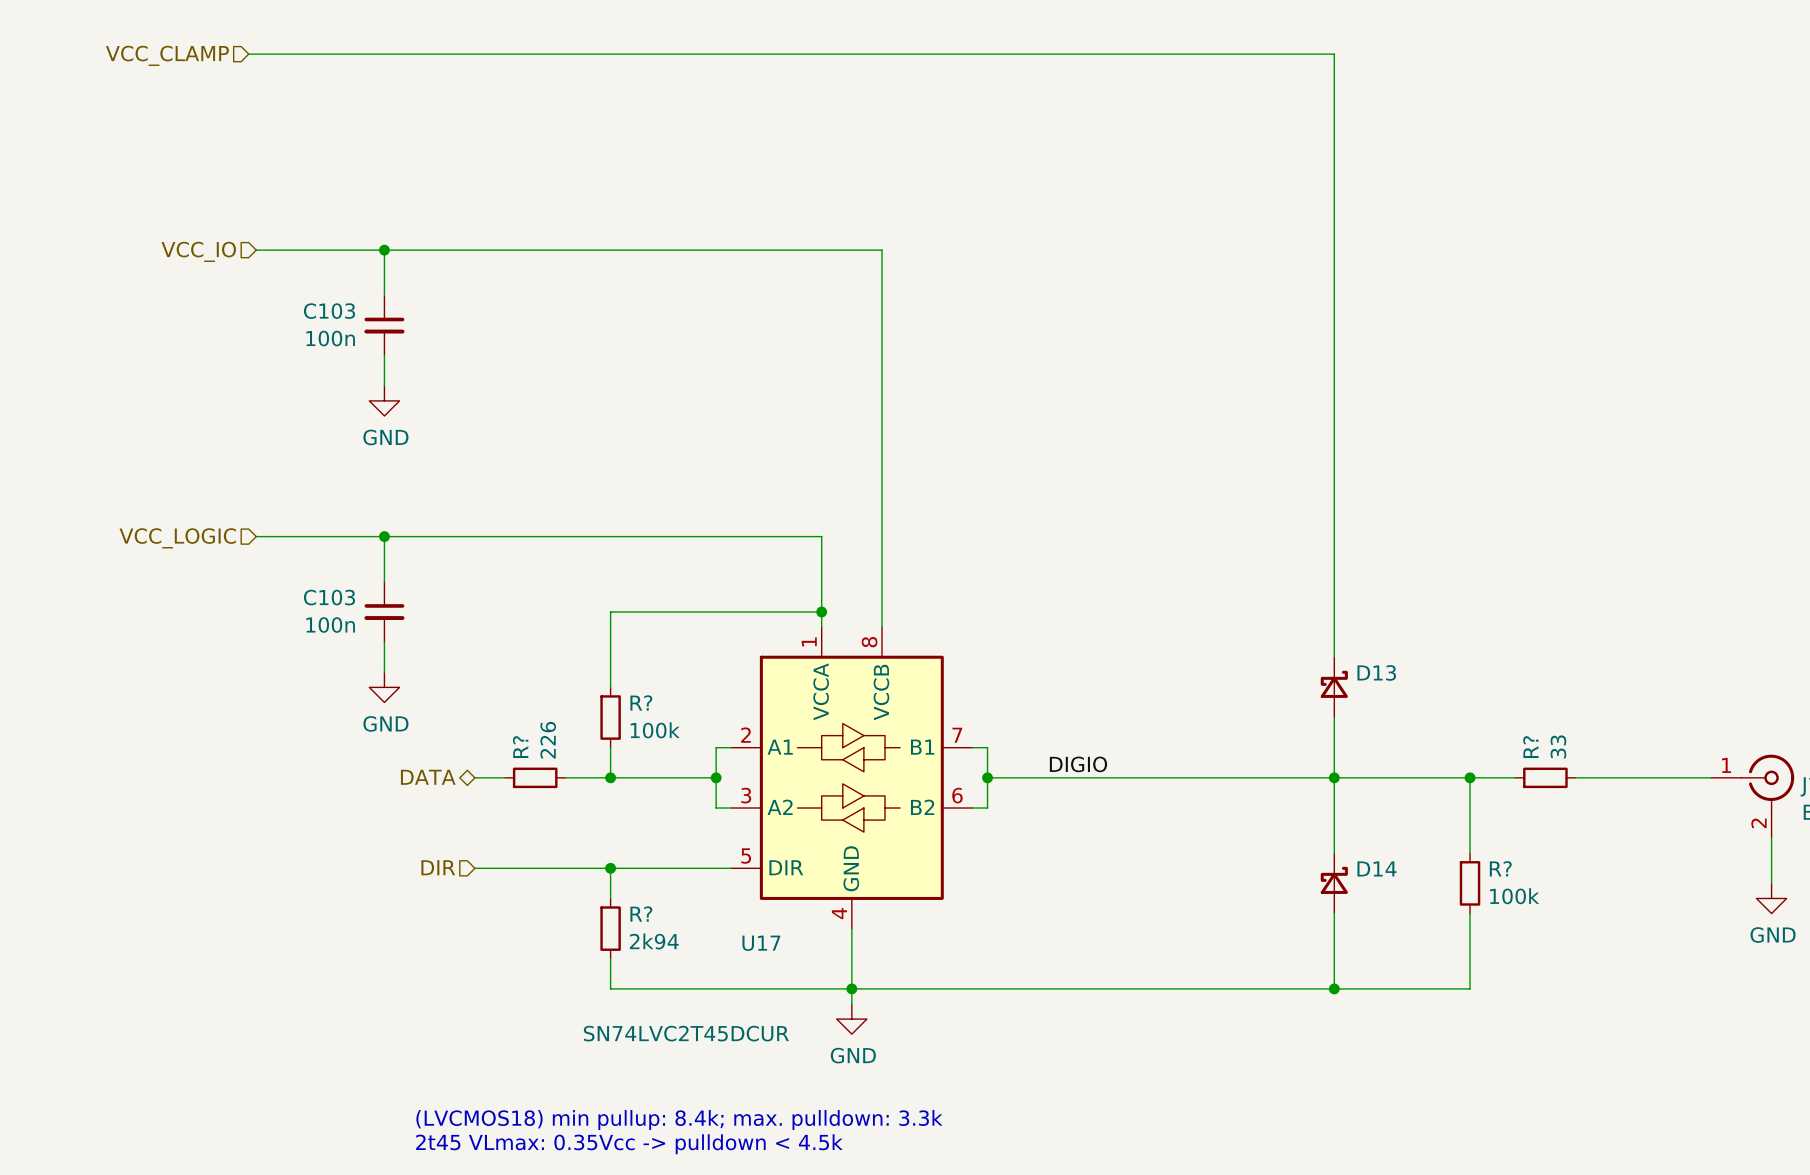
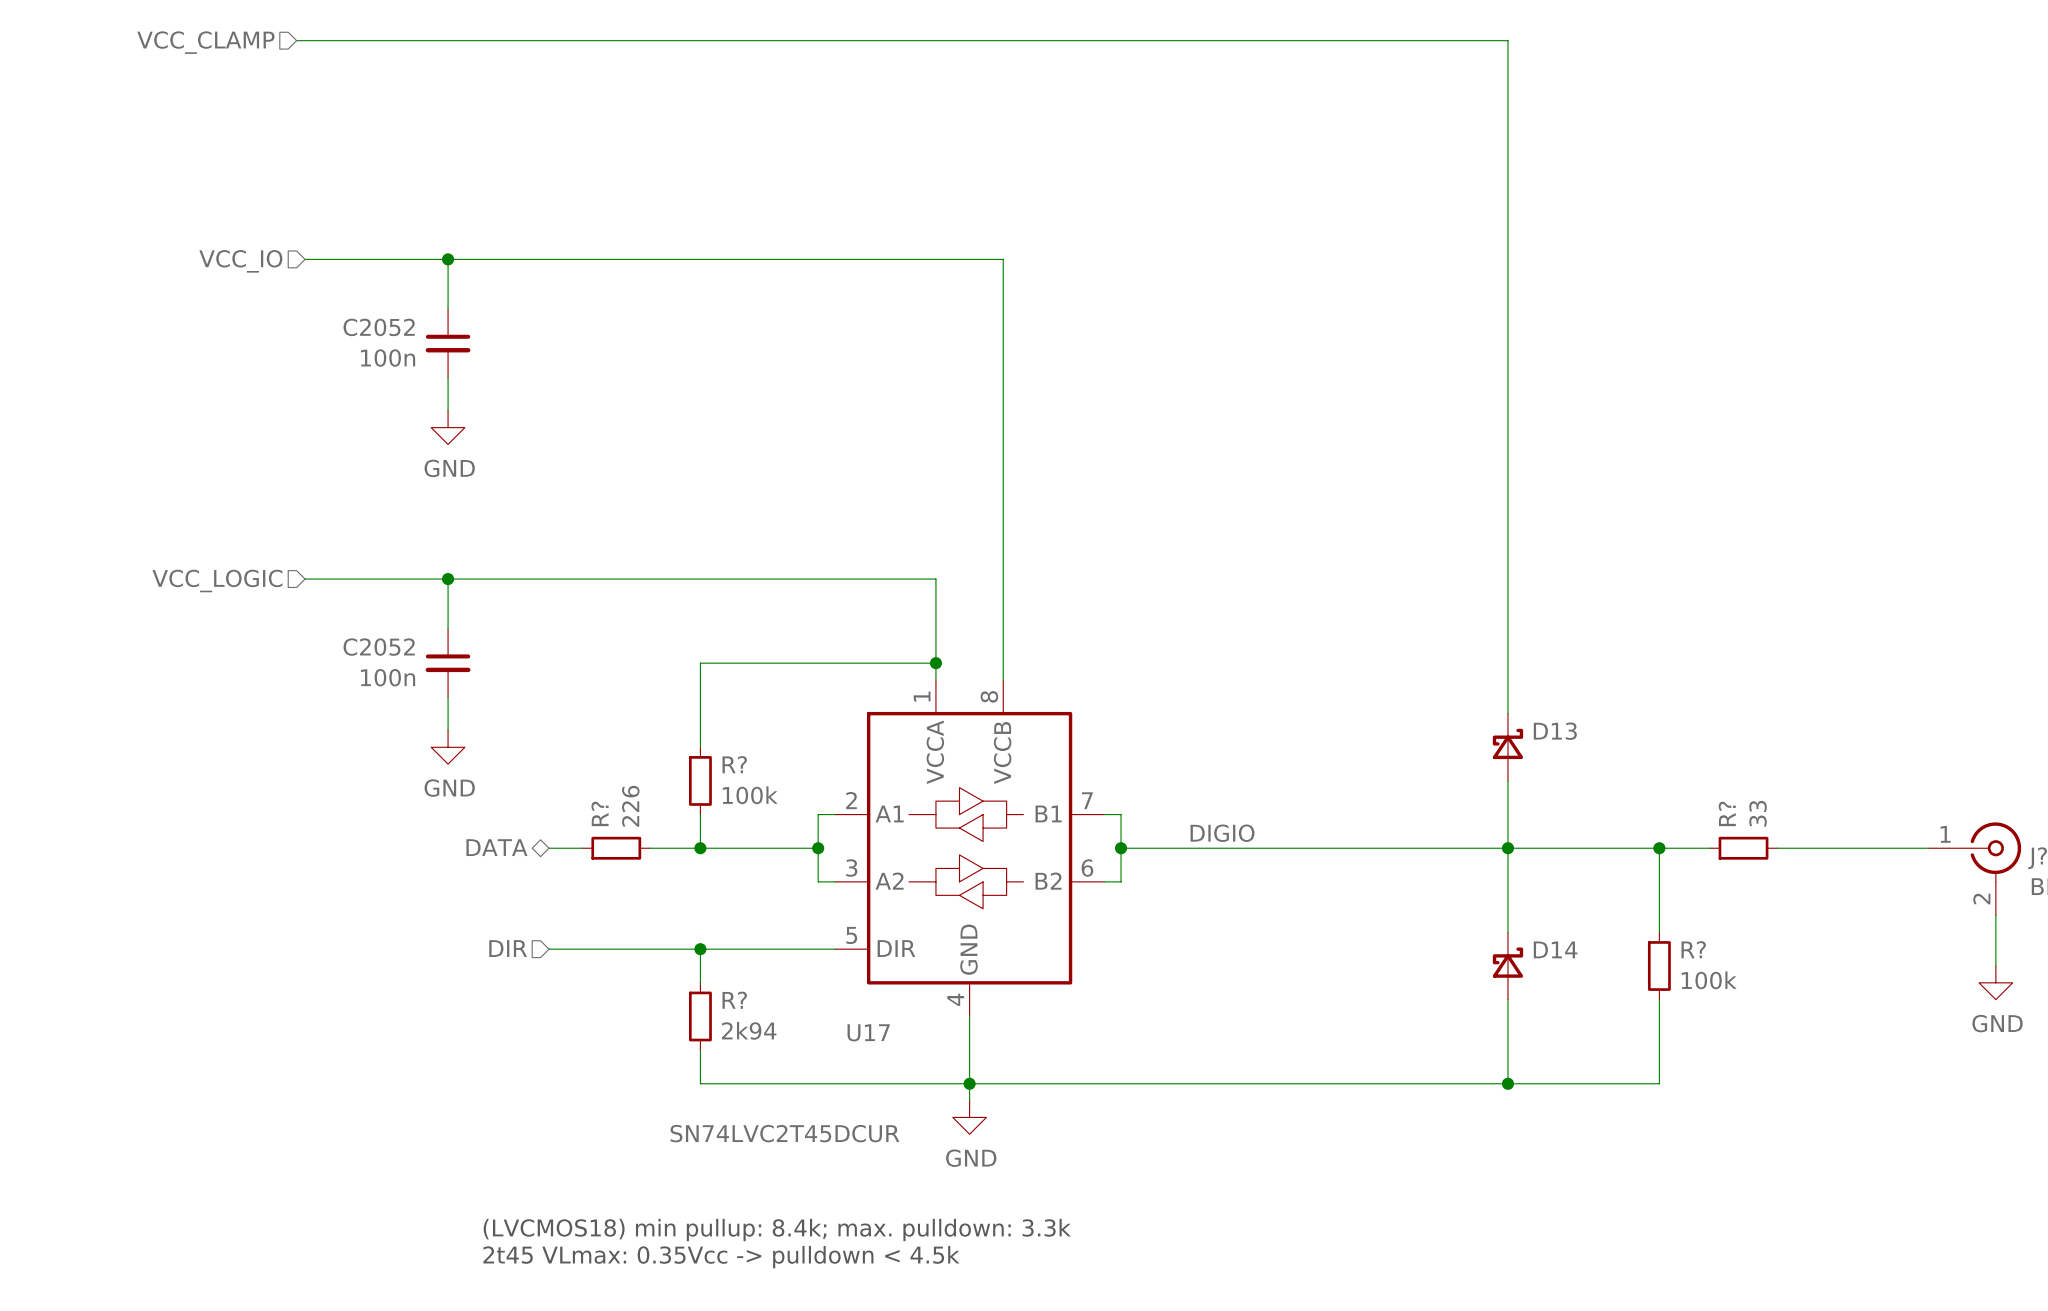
C103 name: C103 (329, 311) -> C2052 (379, 327)
C103 name: C103 (329, 597) -> C2052 (379, 647)

